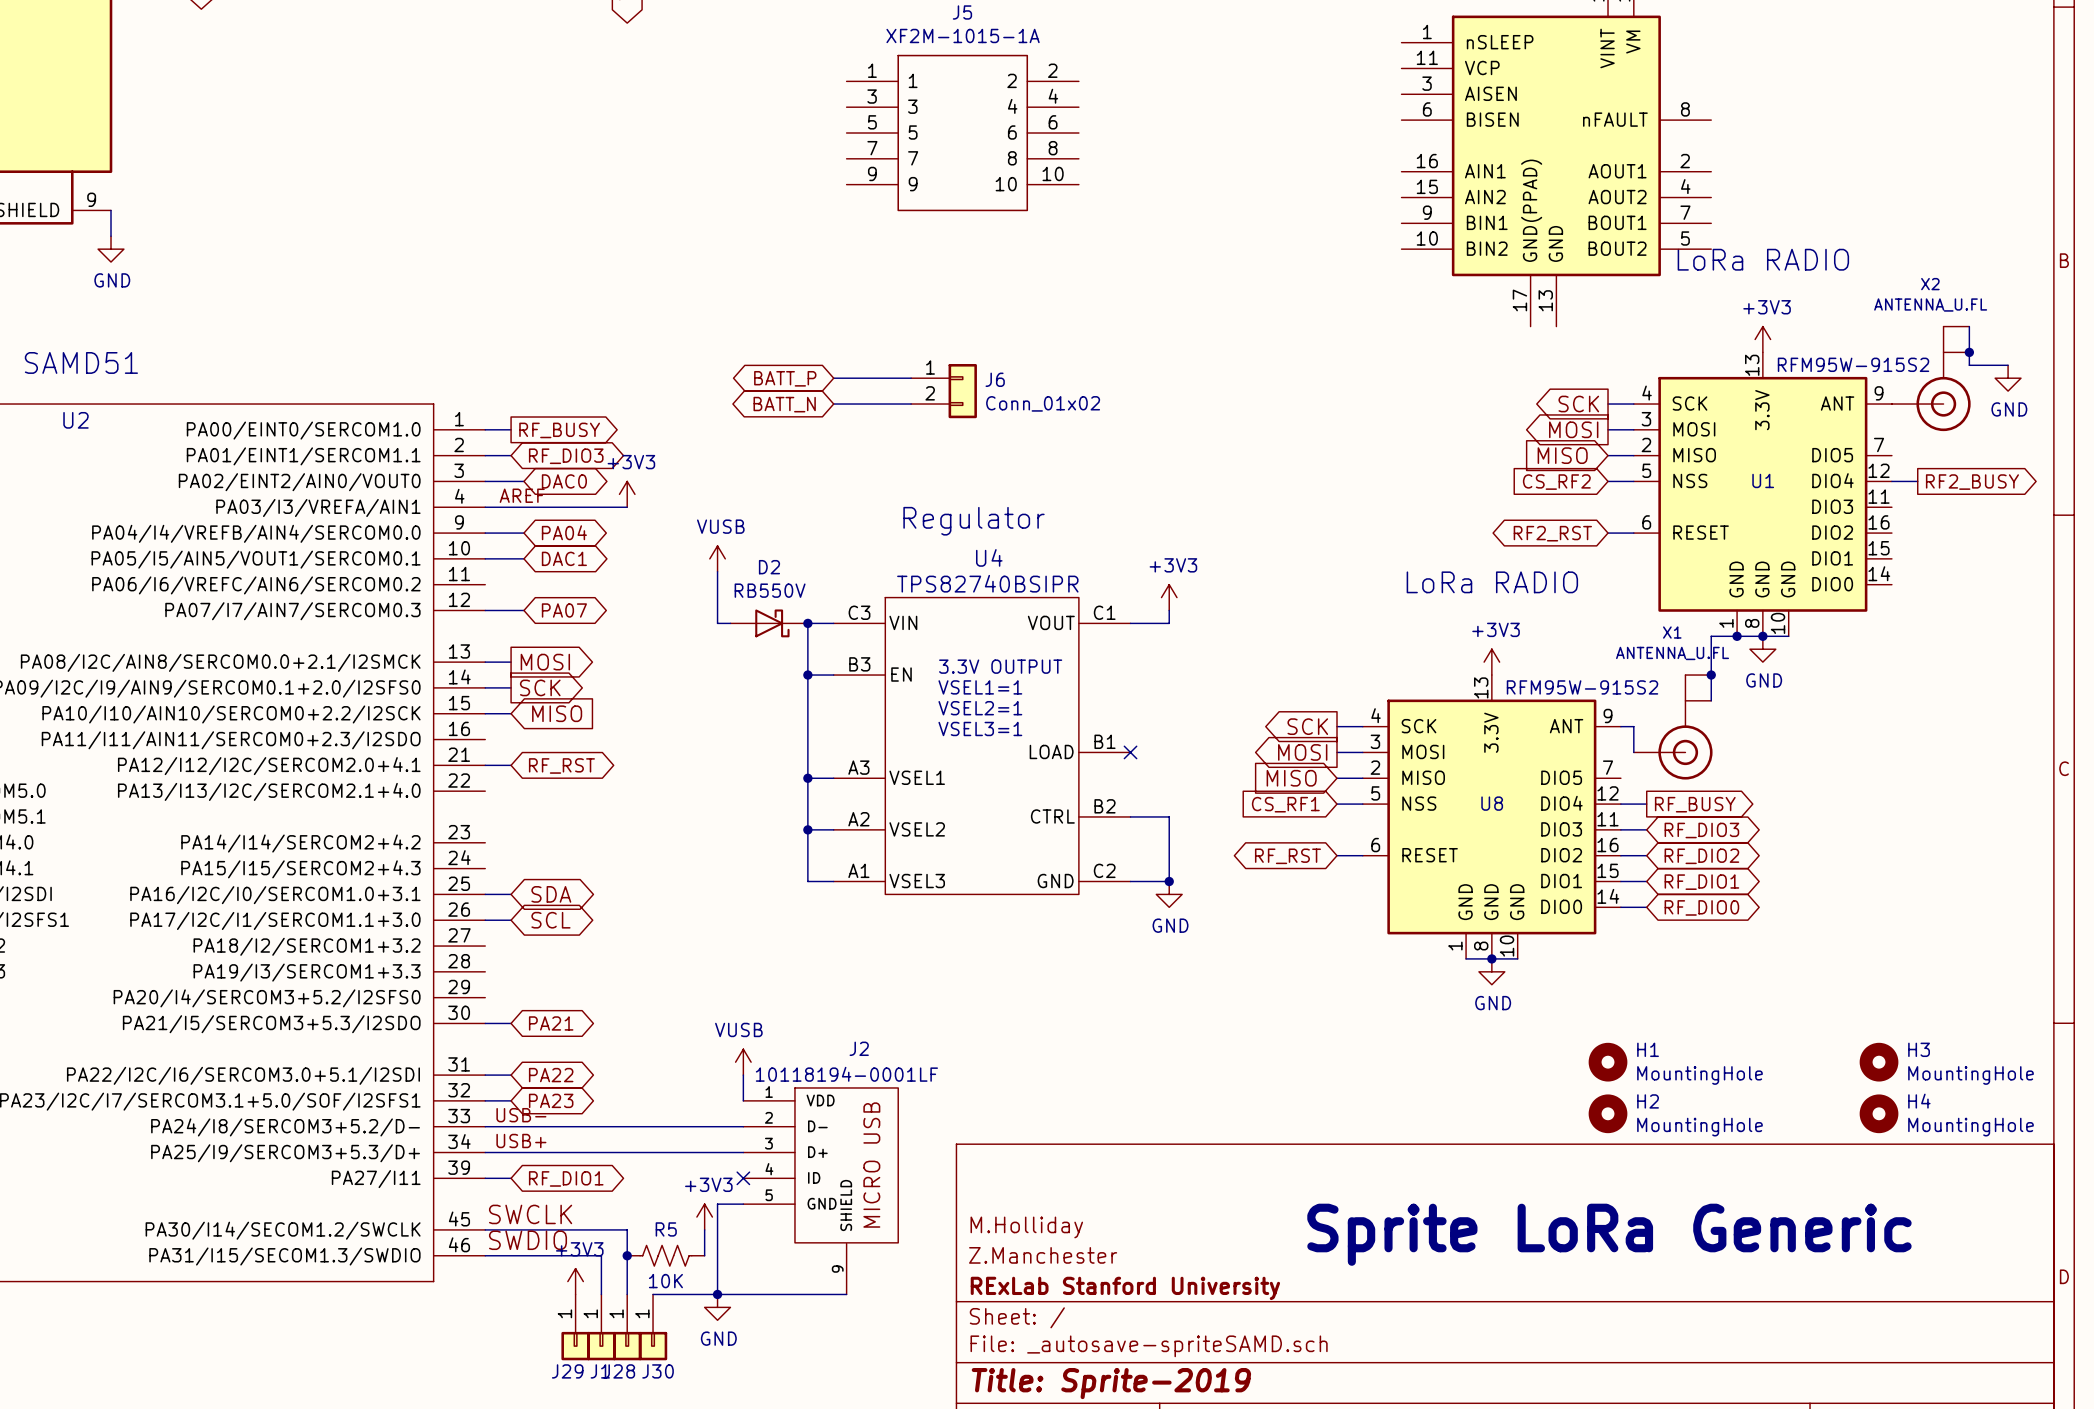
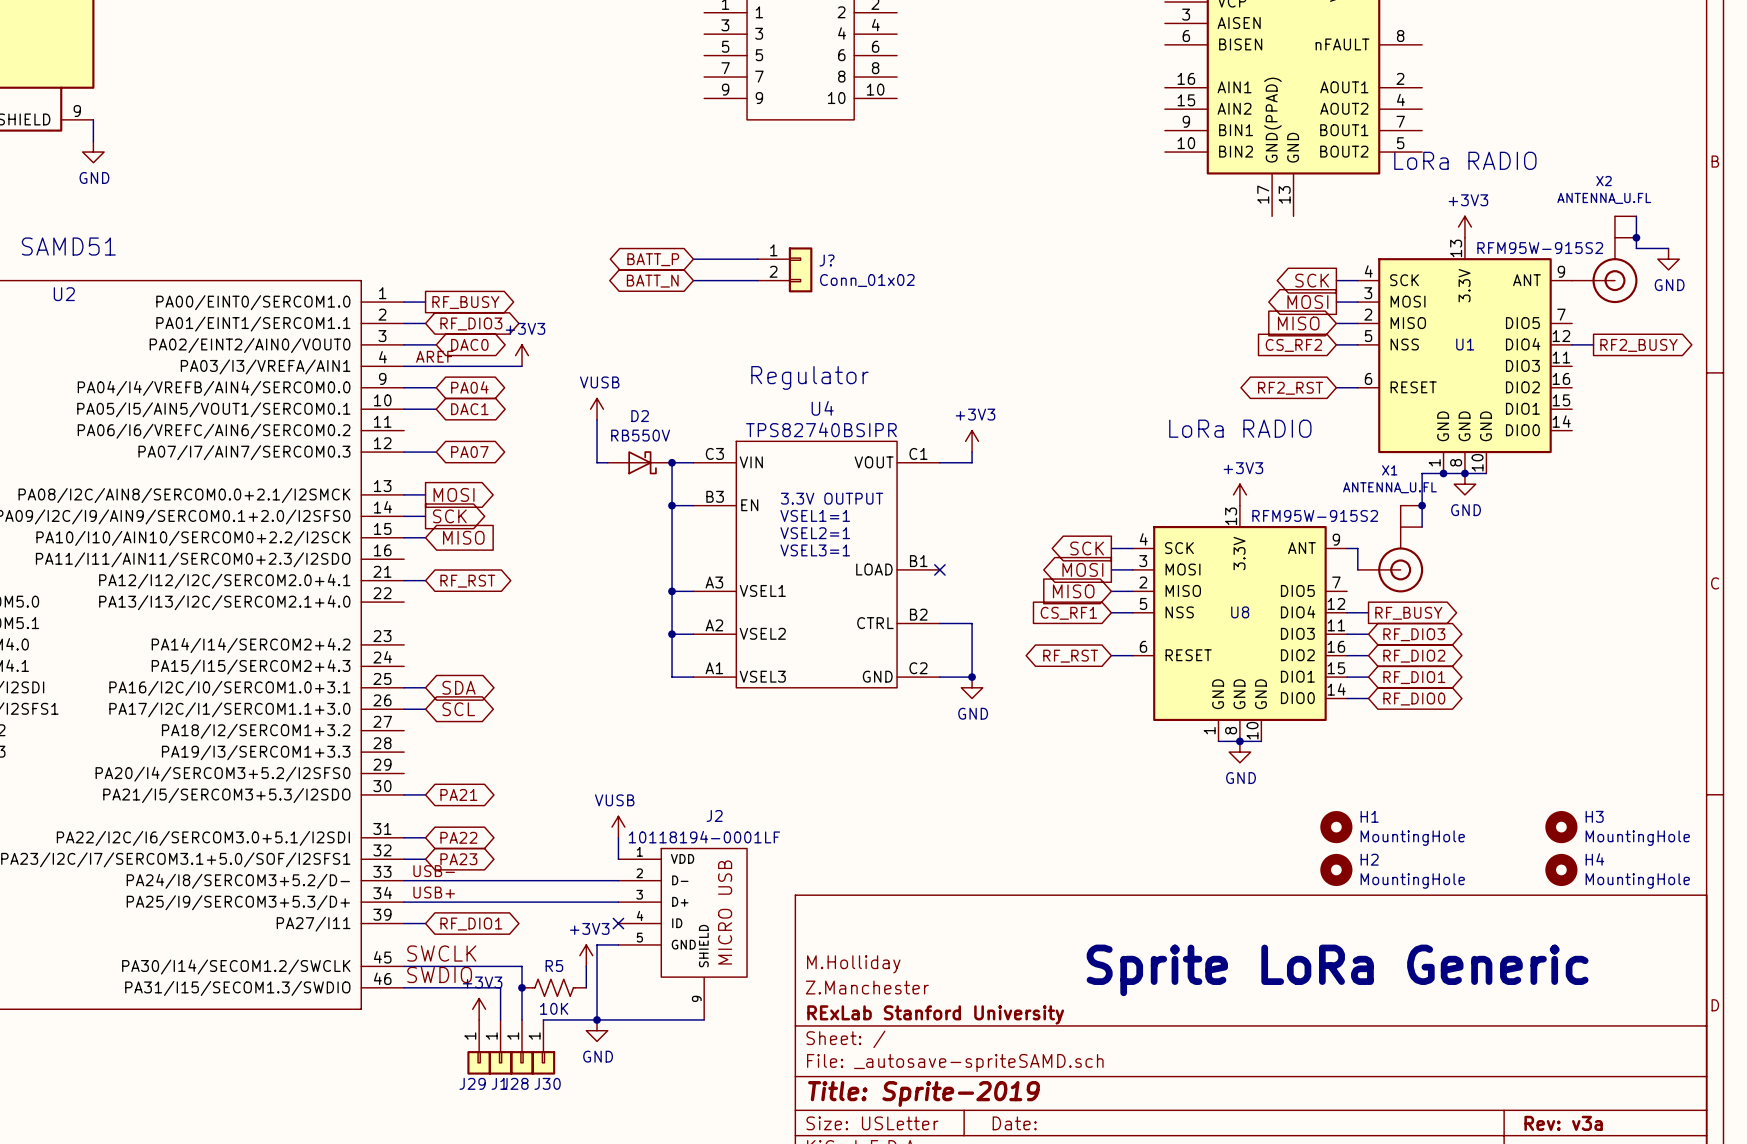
J6 name: J6 (995, 379) -> J? (827, 260)

